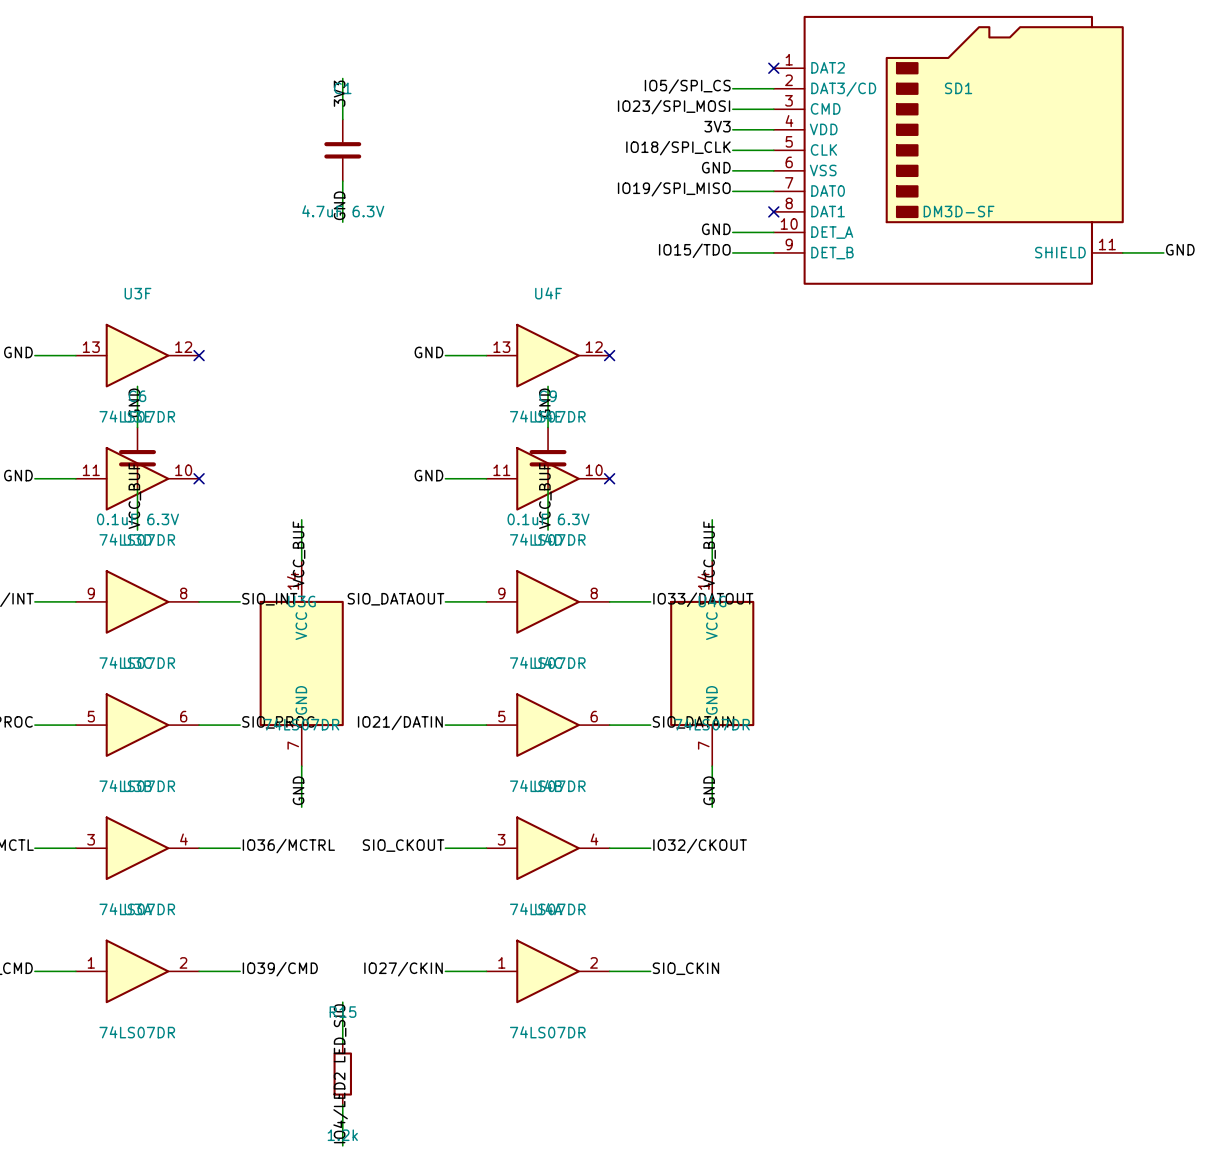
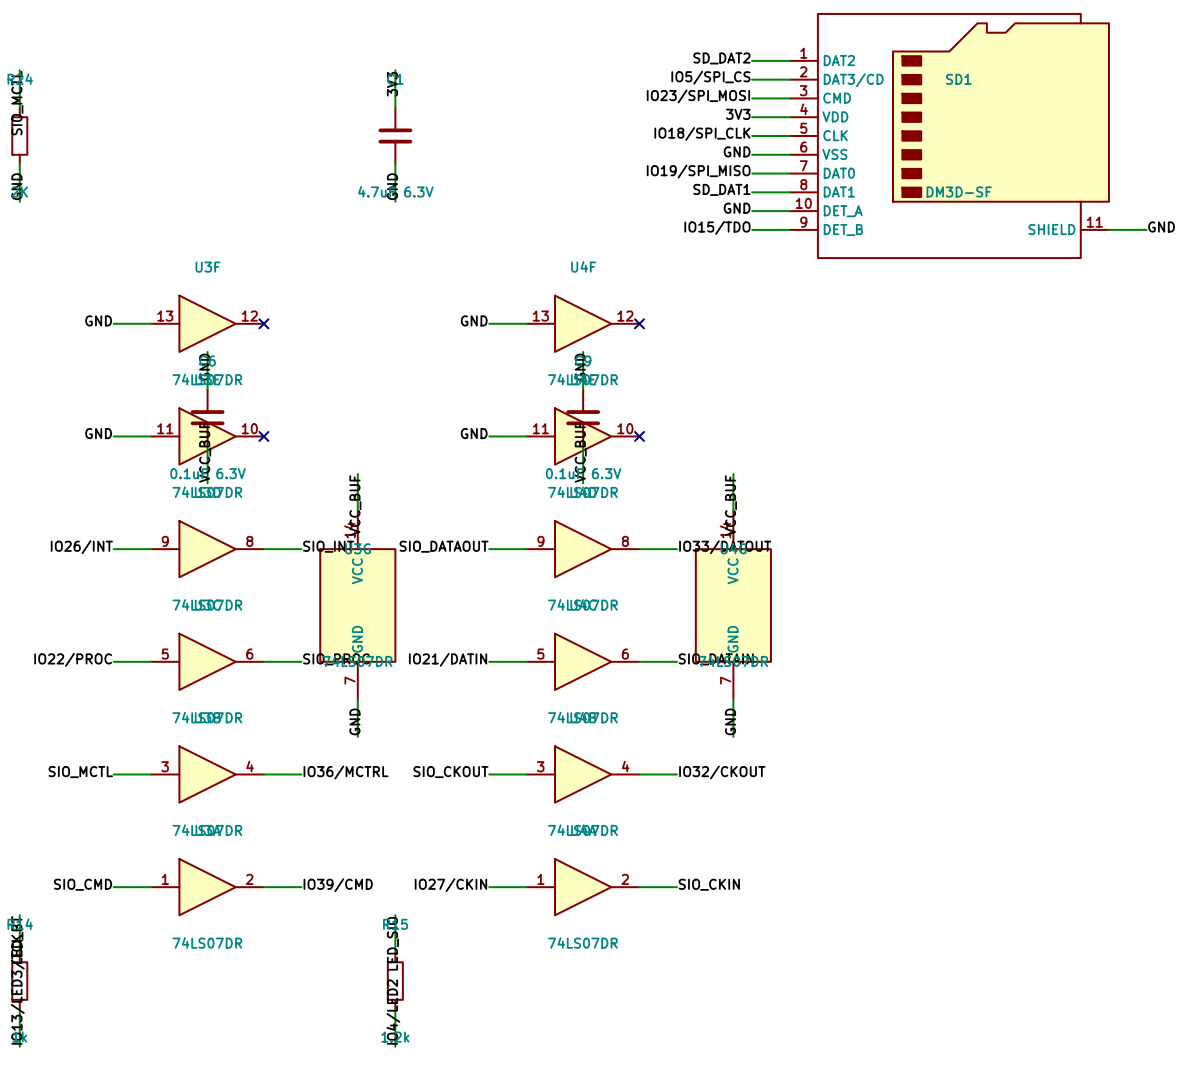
label: none -> SD_DAT2 (721, 58)
wire: none -> (752, 60) (789, 60)
no-connect mark: (773, 68) -> none
label: none -> SD_DAT1 (721, 189)
wire: none -> (752, 192) (789, 192)
no-connect mark: (773, 211) -> none

